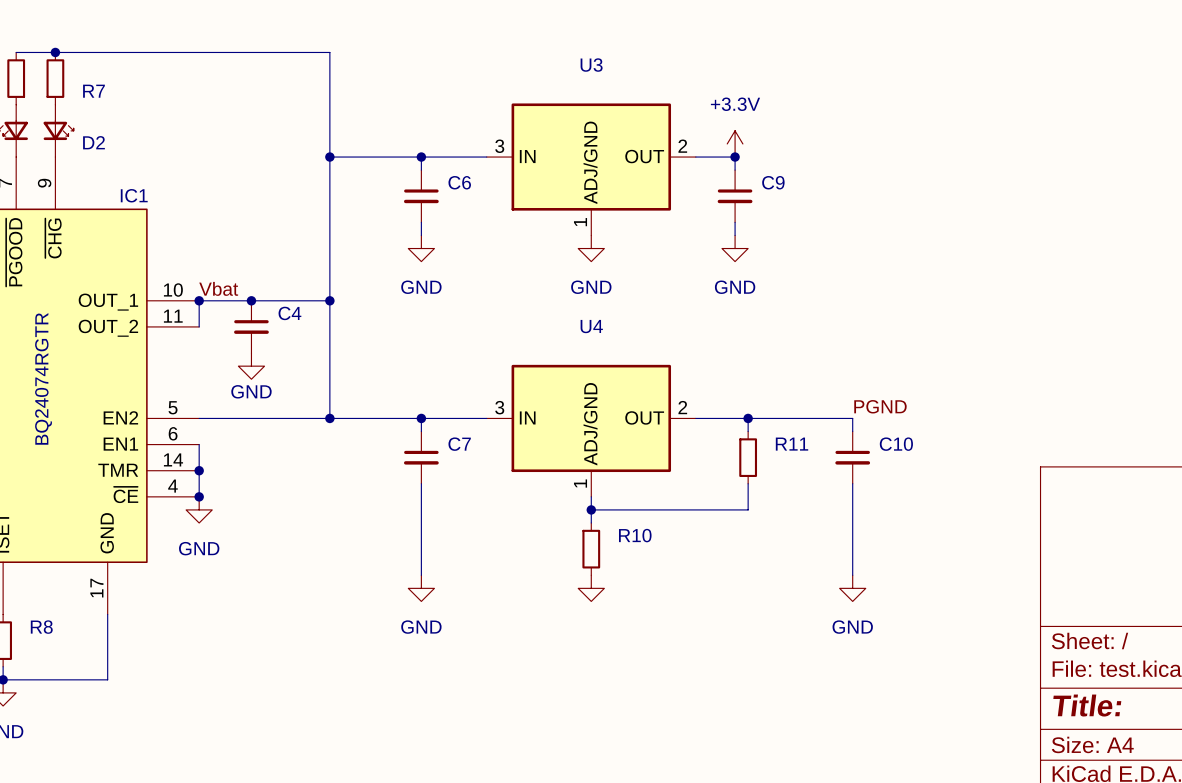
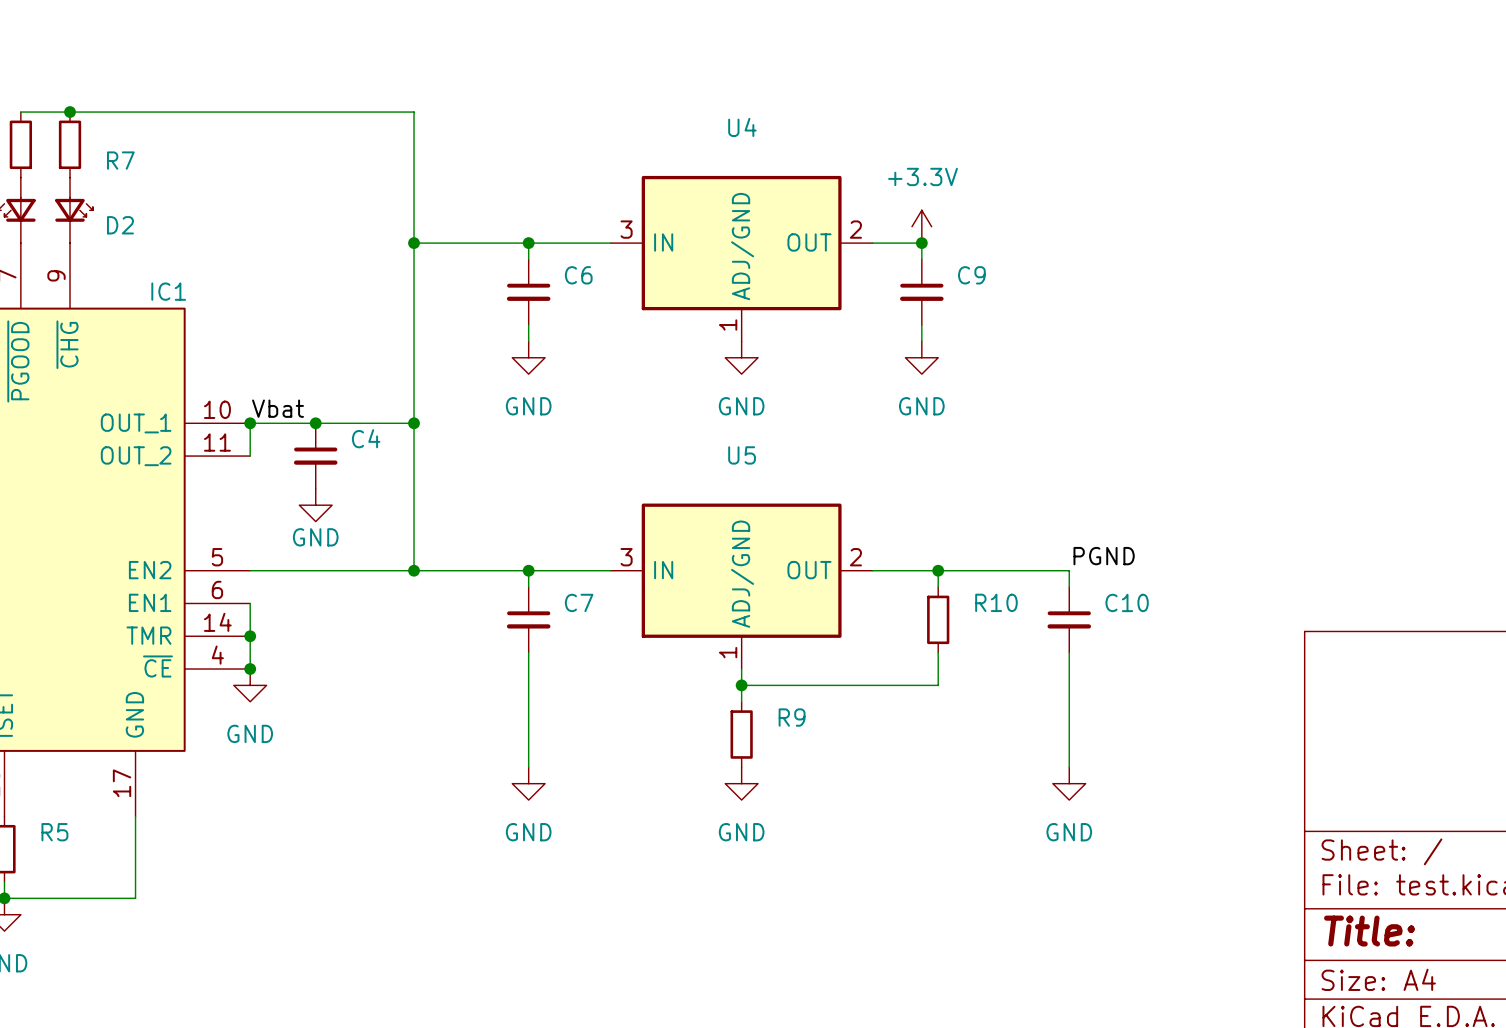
U3 name: U3 (591, 65) -> U4 (742, 127)
U4 name: U4 (591, 326) -> U5 (742, 455)
IC1 value: BQ24074RGTR (43, 378) -> none
R11 name: R11 (792, 444) -> R10 (996, 602)
R10 name: R10 (635, 535) -> R9 (792, 717)
R8 name: R8 (41, 627) -> R5 (54, 832)
power symbol text: none -> GND (741, 832)

